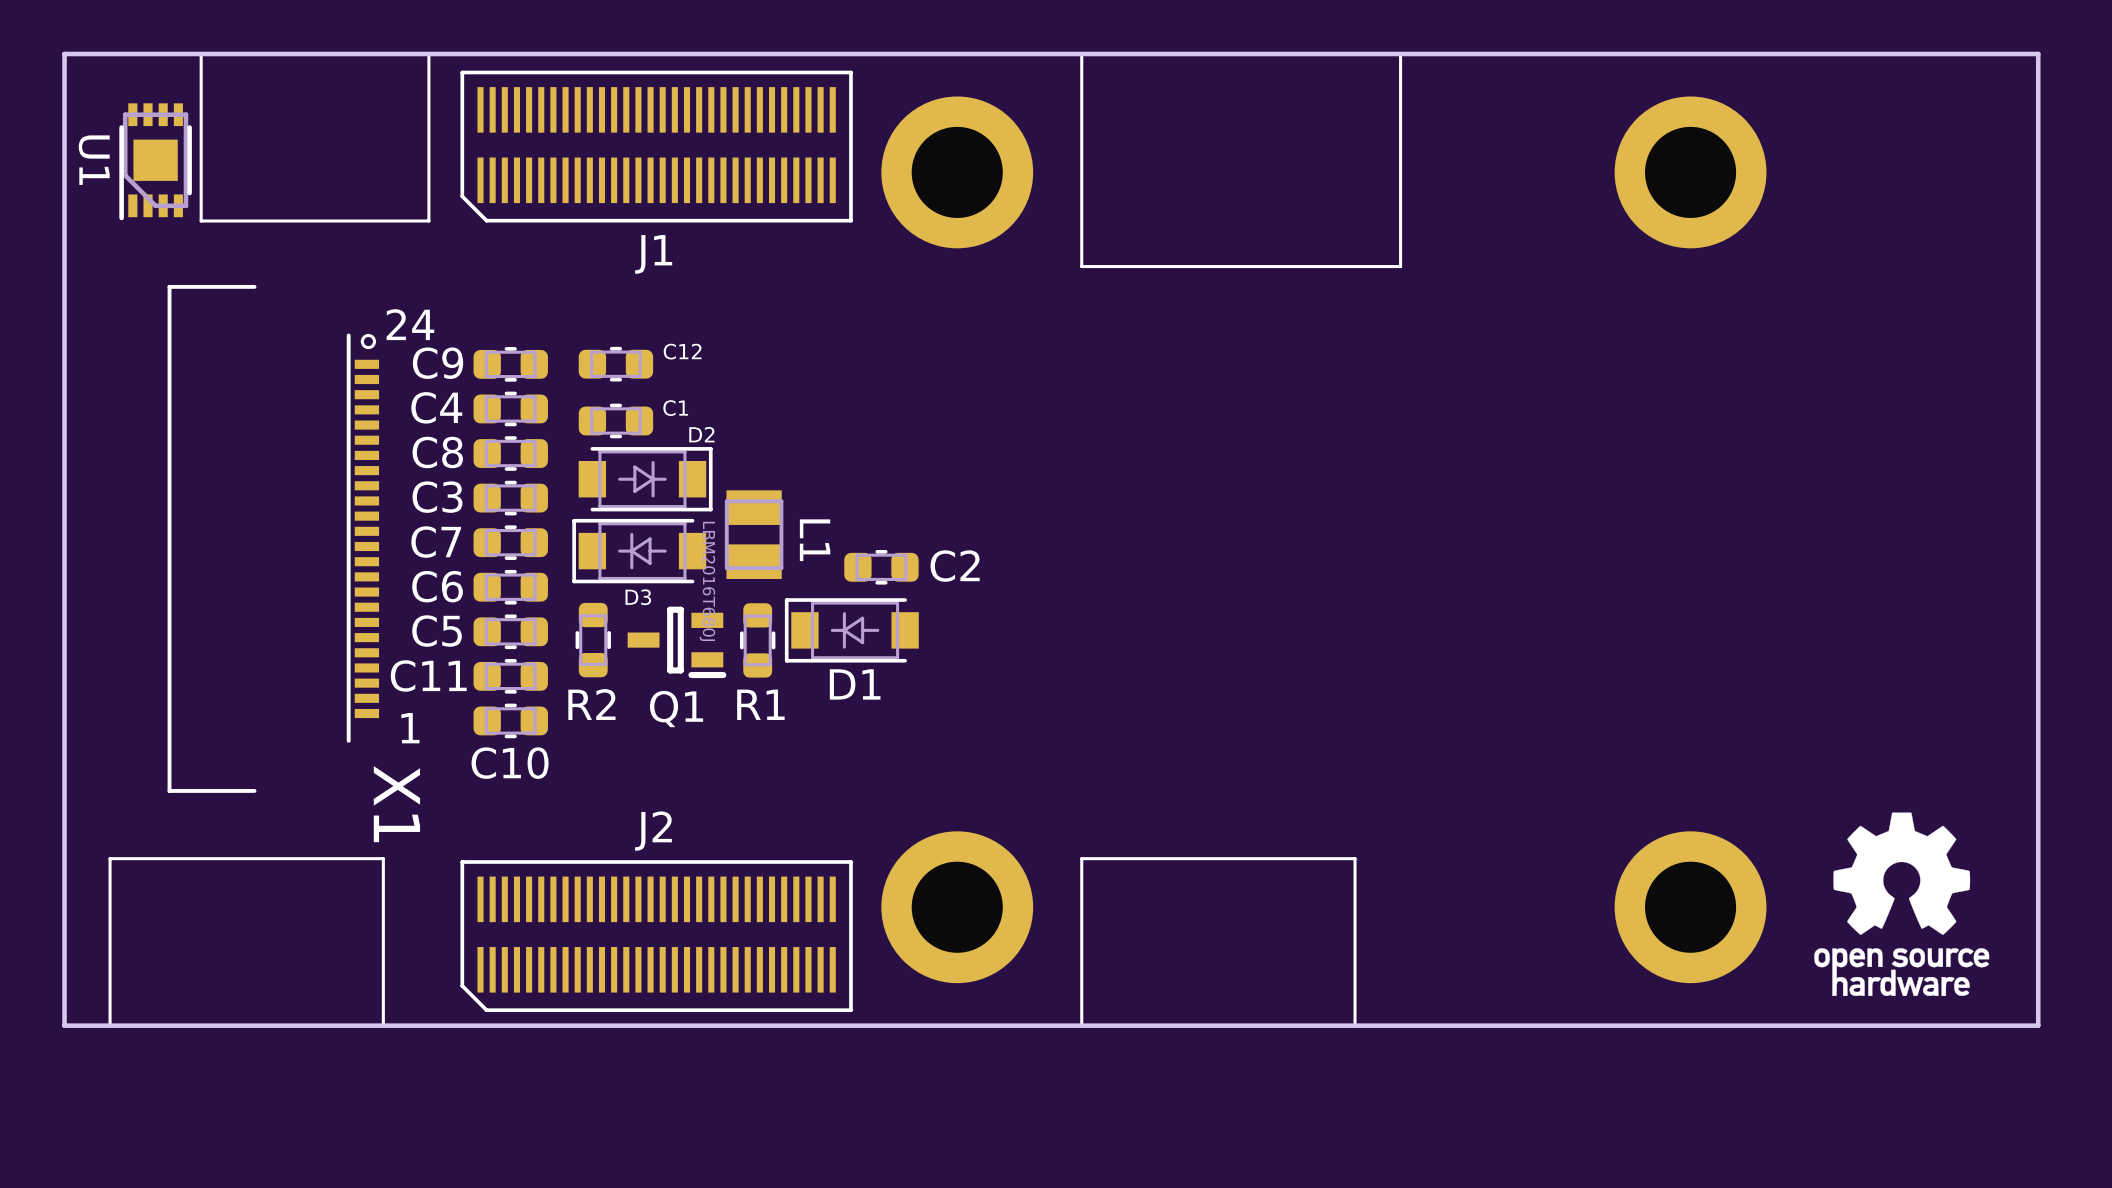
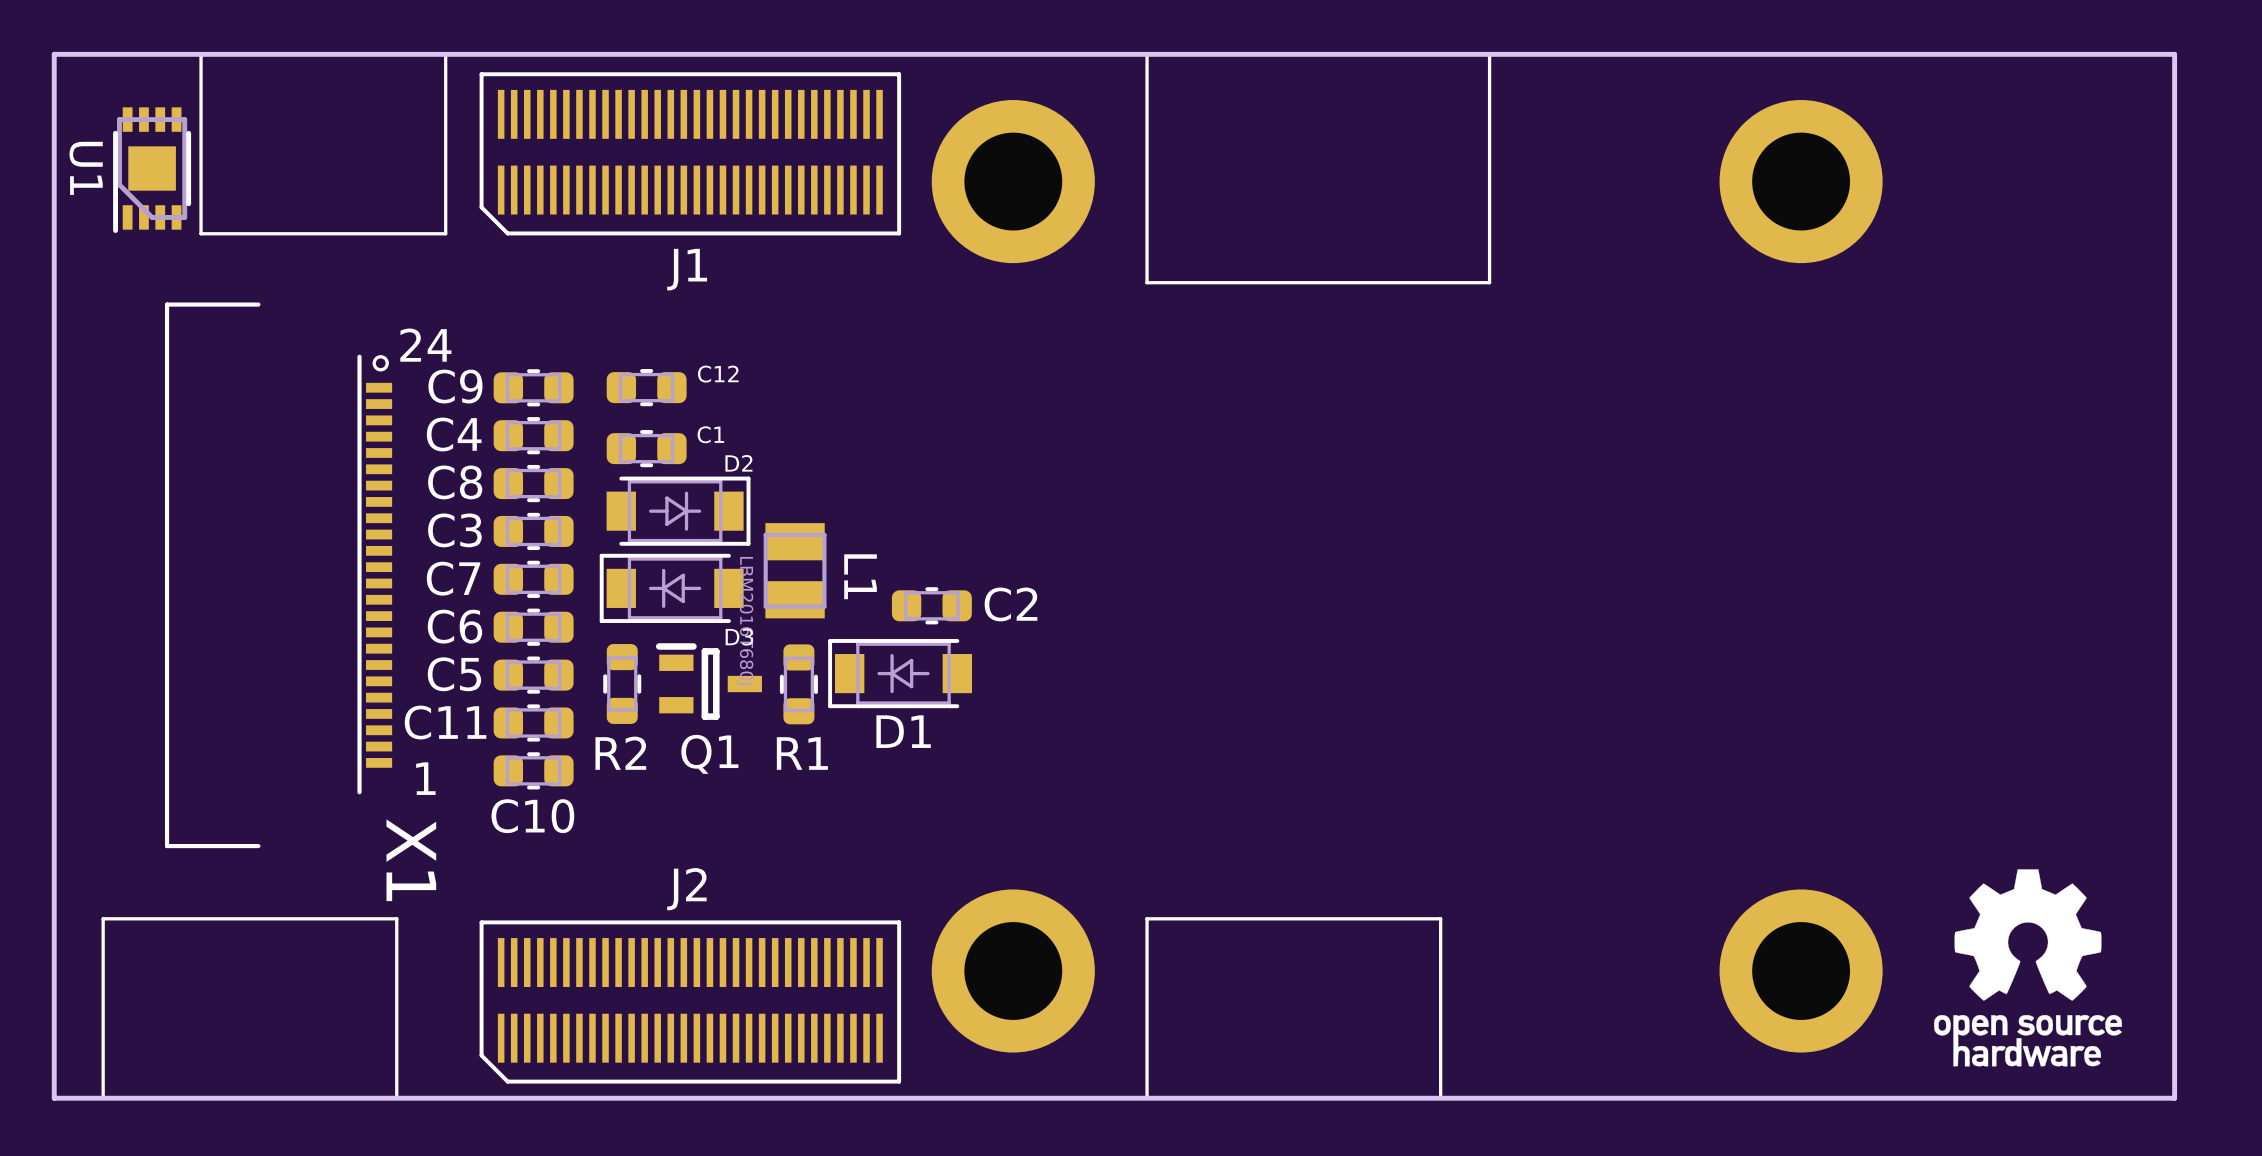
D3 name position: D3 (638, 597) -> D3 (739, 637)
Q1 rotation: 0° (676, 642) -> 180° (708, 681)

